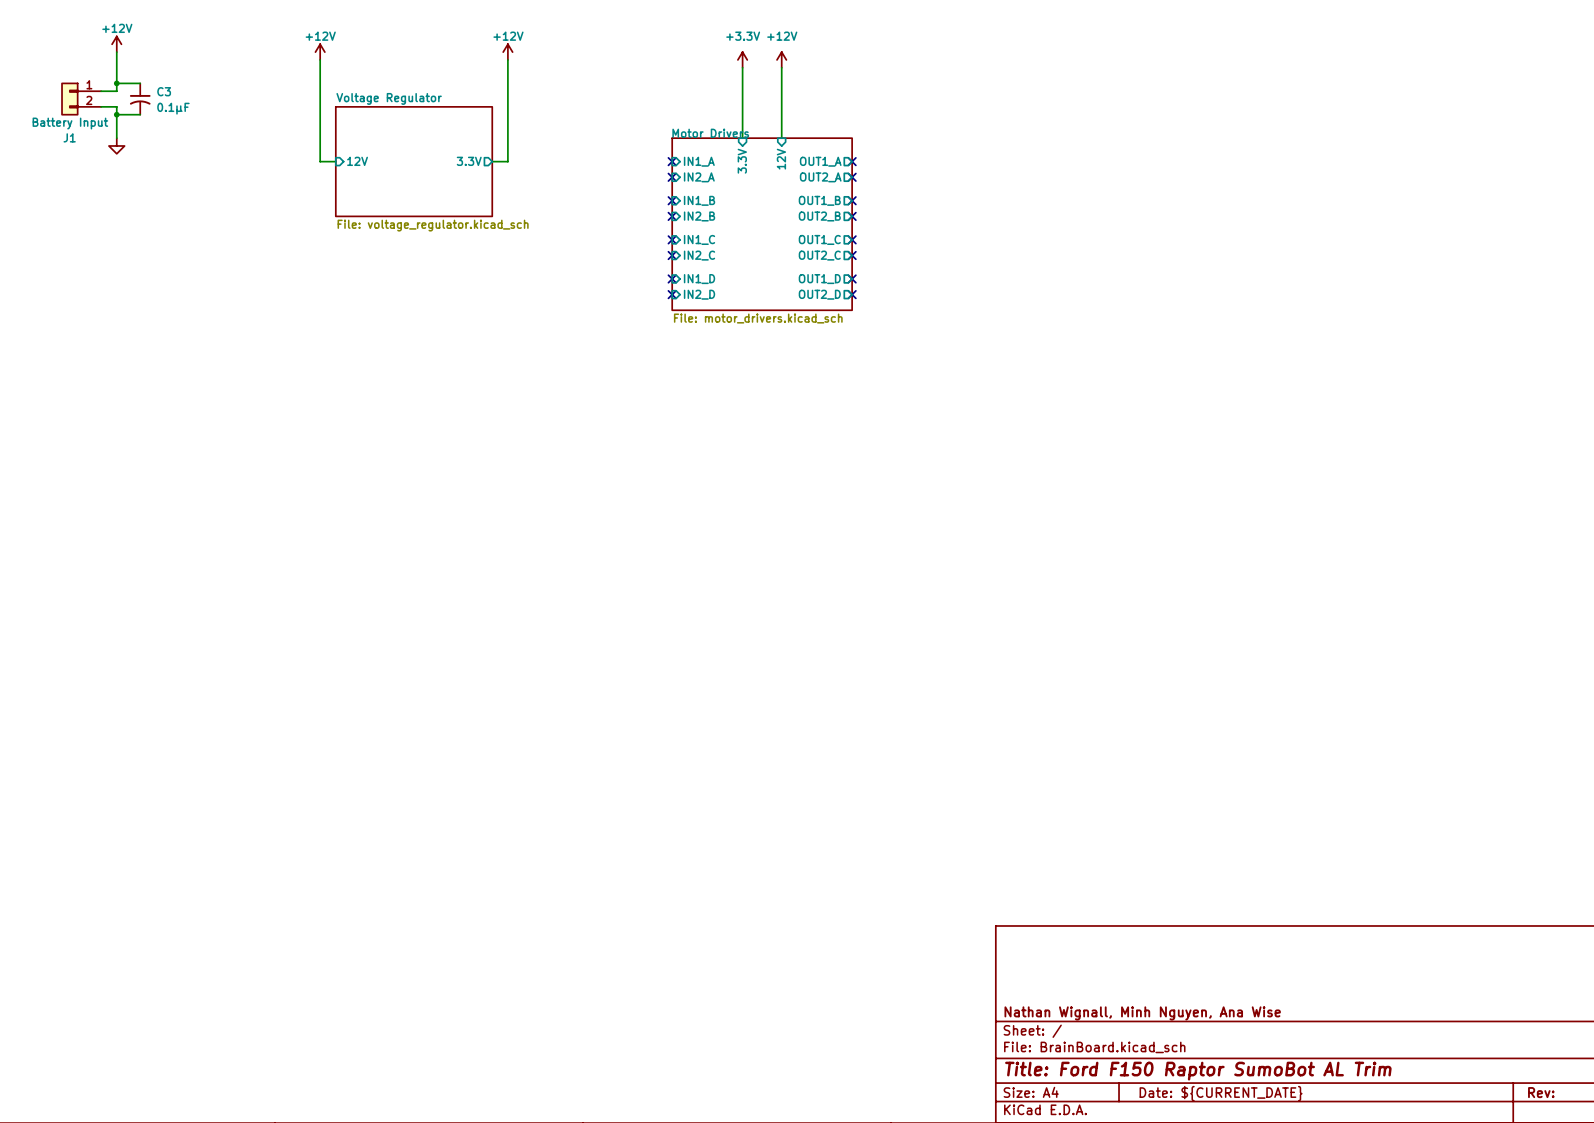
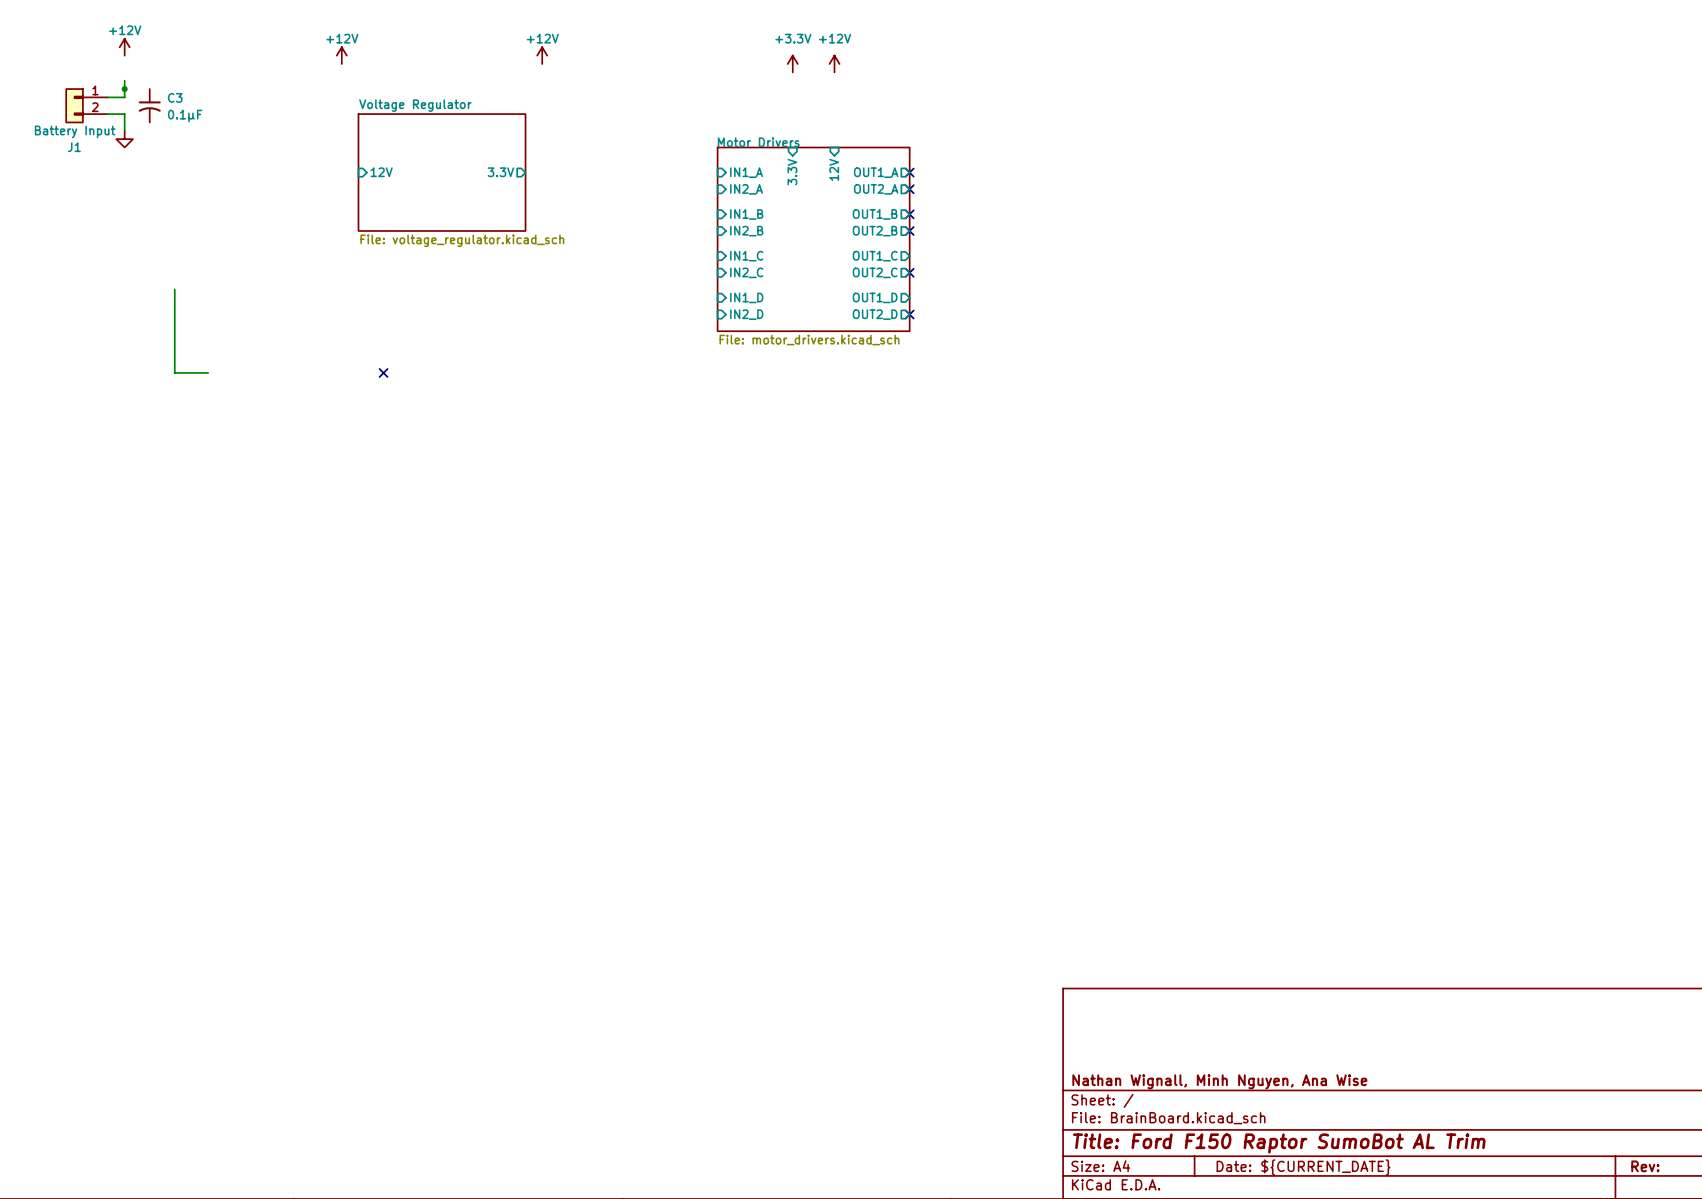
wire: (116, 52) (116, 75) -> none
wire: (320, 59) (320, 161) (335, 161) -> none
wire: (507, 59) (507, 161) (492, 161) -> none
wire: (742, 67) (742, 138) -> none
wire: (781, 67) (781, 138) -> none
wire: (116, 83) (140, 83) -> none
wire: (116, 114) (140, 114) -> none
junction: (116, 114) -> none
power symbol position: (116, 145) -> (124, 139)
no-connect mark: (672, 161) -> none
no-connect mark: (672, 177) -> none
no-connect mark: (672, 200) -> none
no-connect mark: (672, 216) -> none
no-connect mark: (672, 239) -> none
no-connect mark: (852, 239) -> none
no-connect mark: (672, 255) -> none
wire: none -> (174, 289) (174, 372) (208, 372)
no-connect mark: (672, 278) -> none
no-connect mark: (852, 278) -> none
no-connect mark: (672, 294) -> none
no-connect mark: none -> (383, 372)

